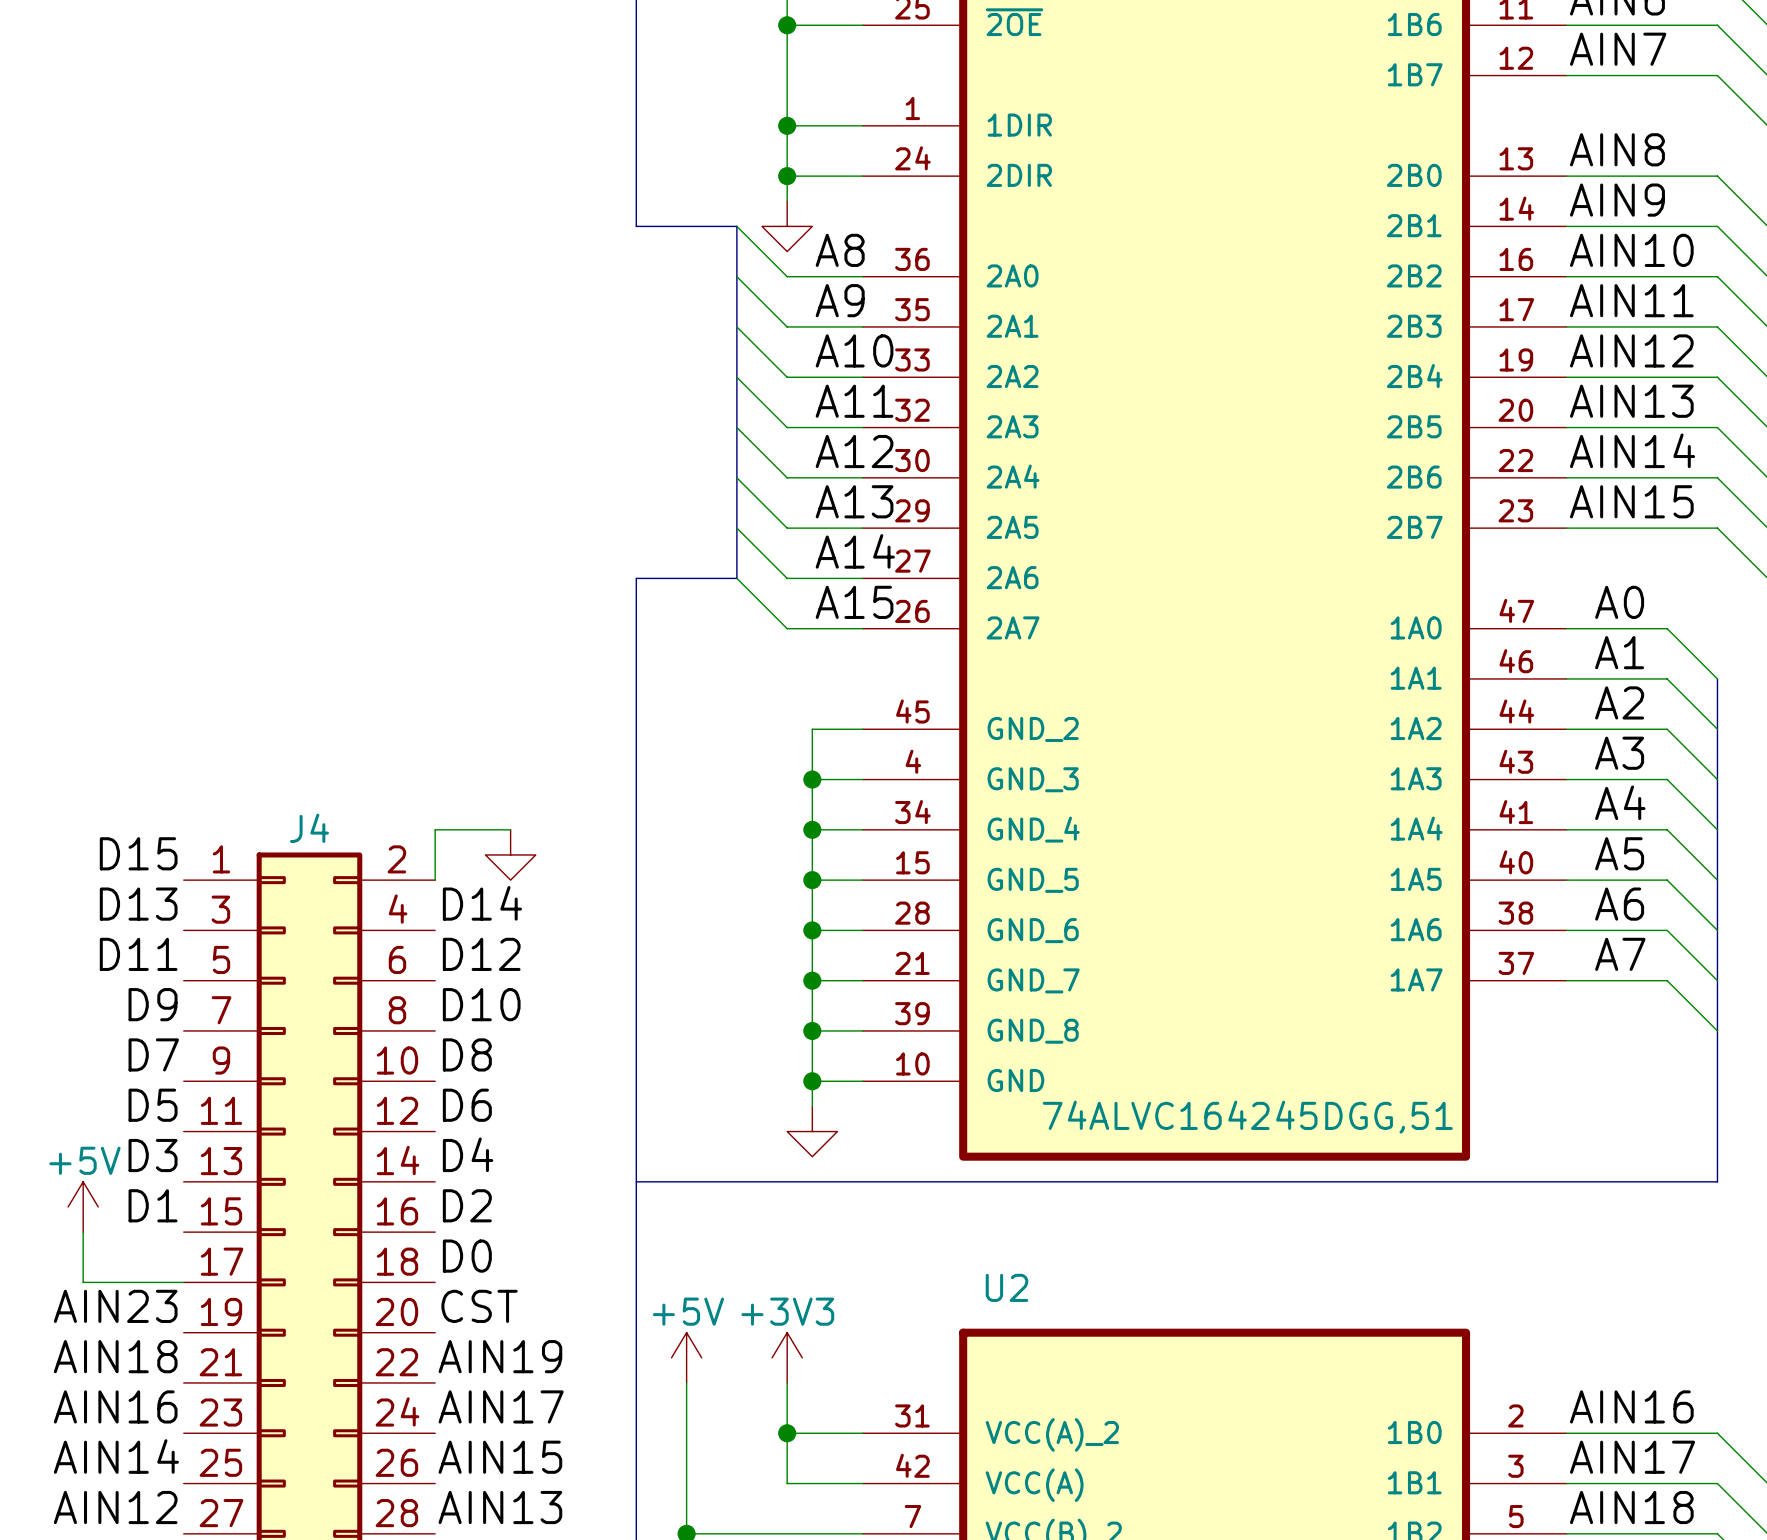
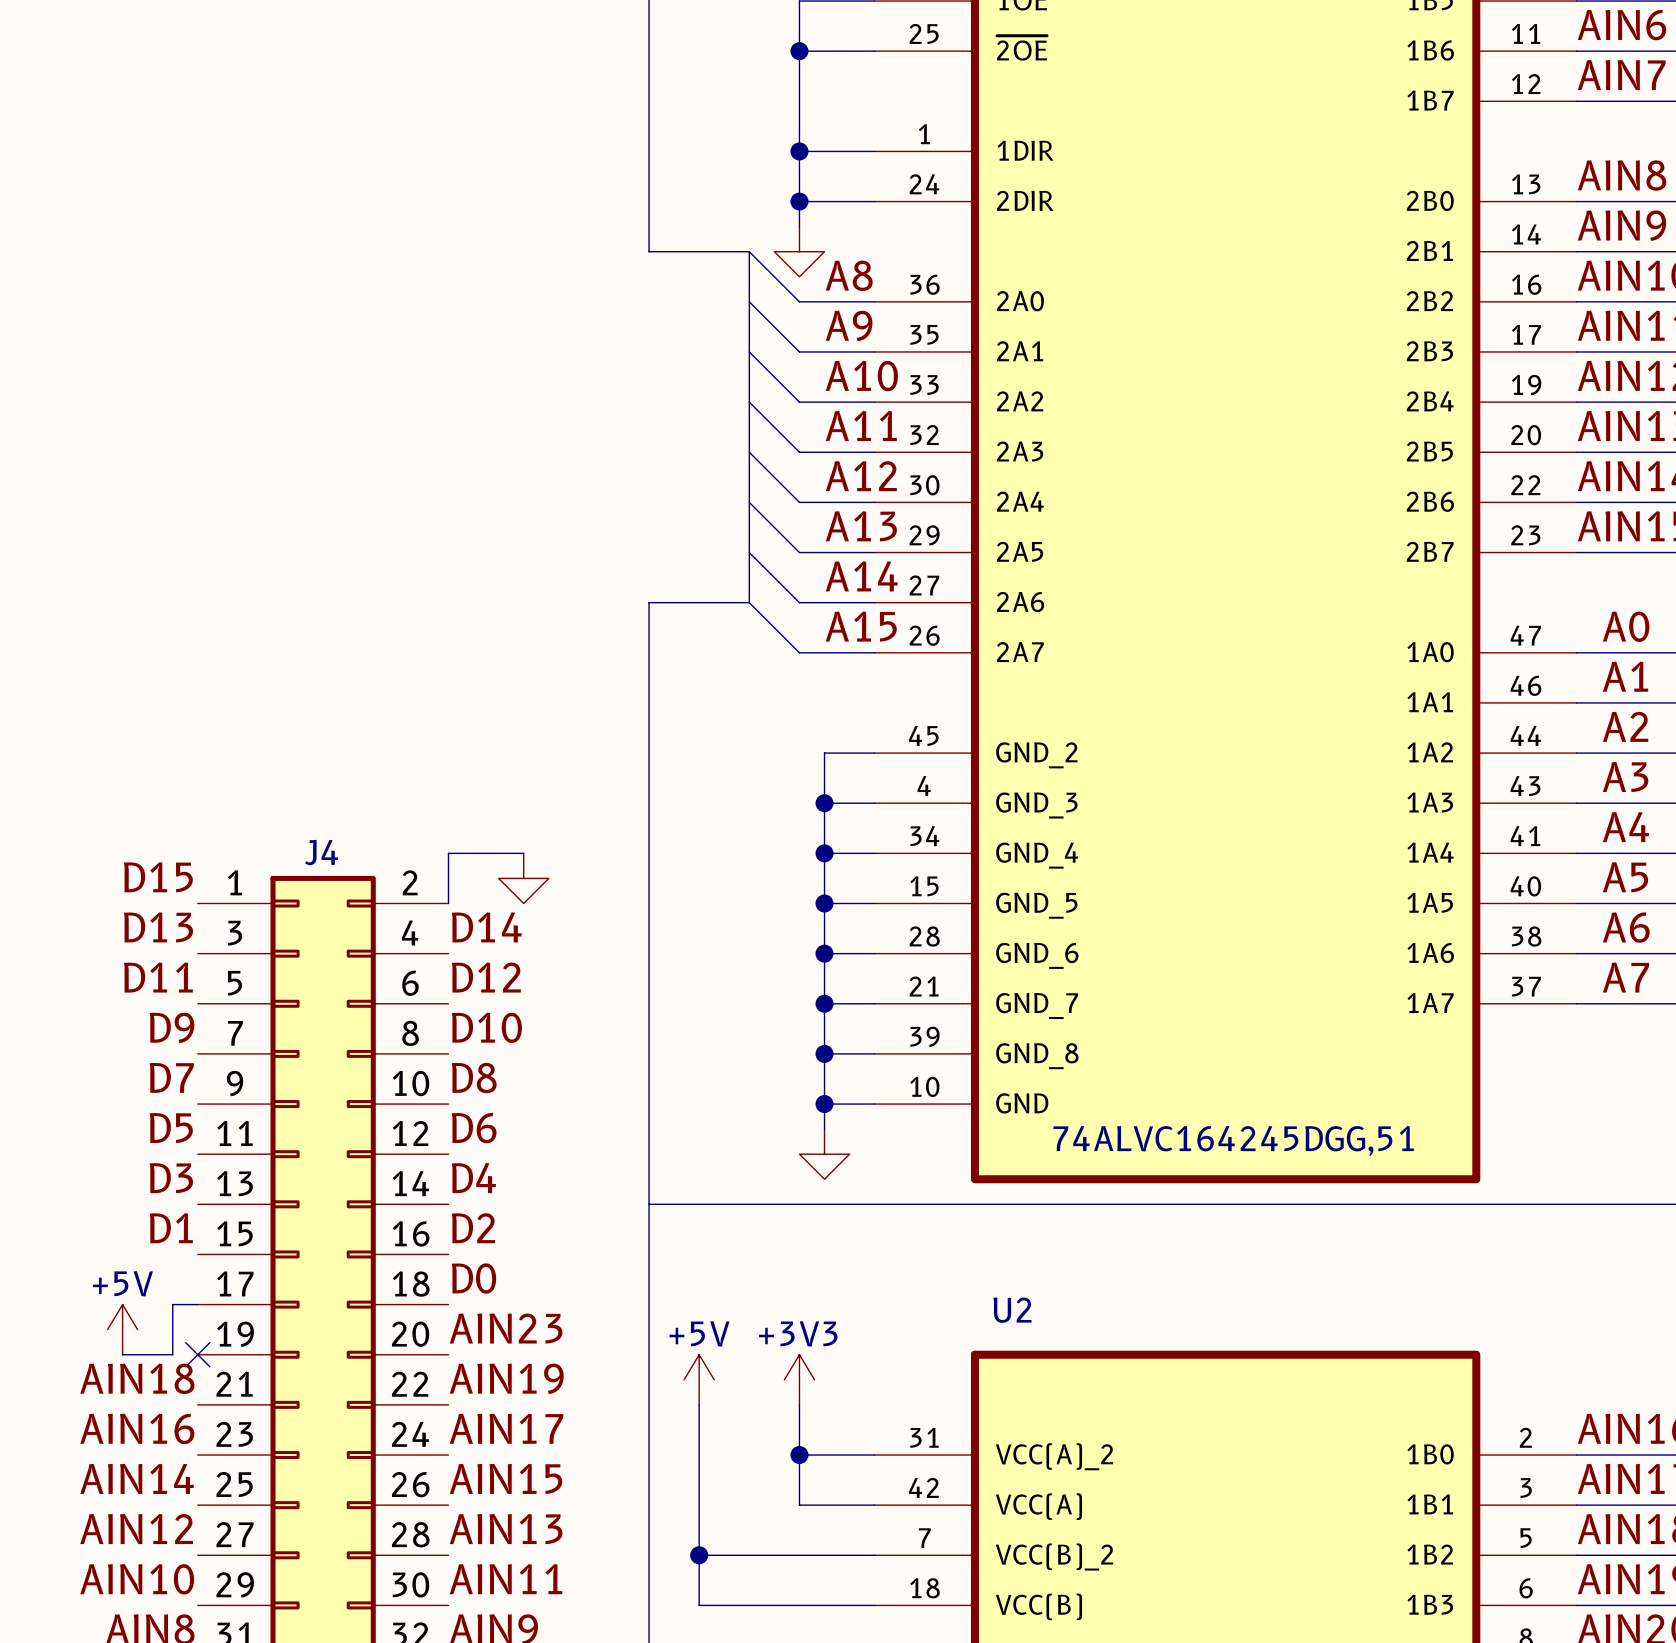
power symbol position: +5V (83, 1206) -> +5V (122, 1329)
wire: (83, 1232) (83, 1282) (158, 1282) -> (122, 1354) (172, 1354) (172, 1304)
label: AIN23 (115, 1306) -> none
label: CST (479, 1306) -> AIN23 (506, 1328)
no-connect mark: none -> (197, 1354)

